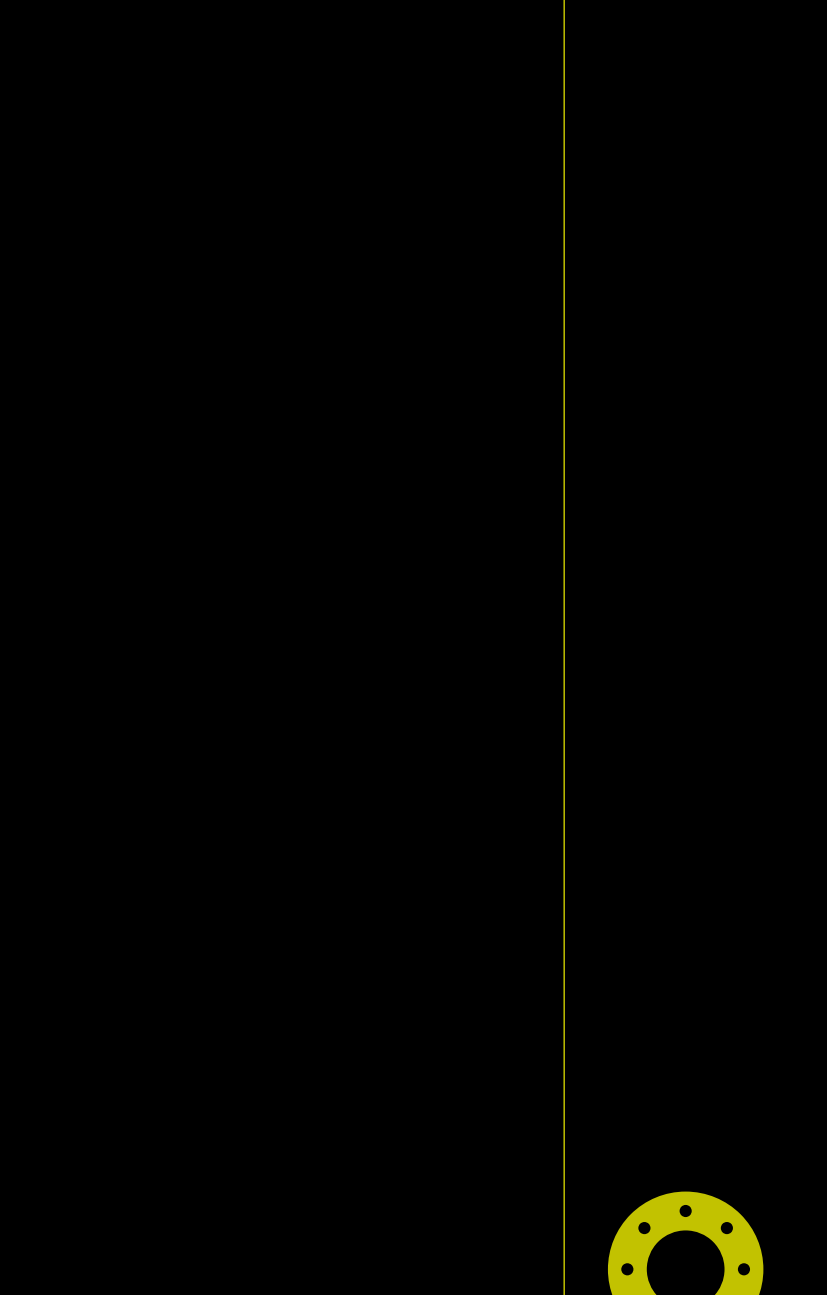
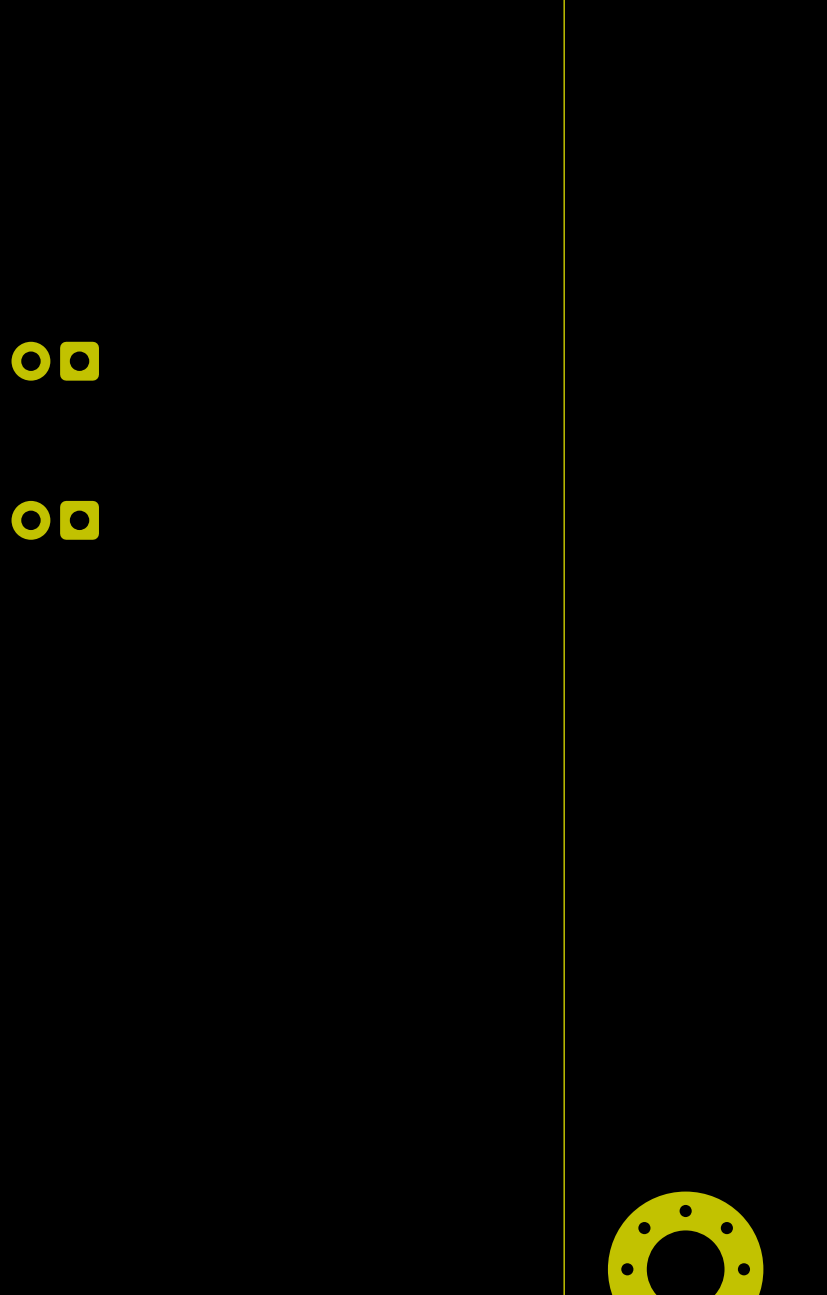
part: none -> (55, 361)
part: none -> (55, 520)

